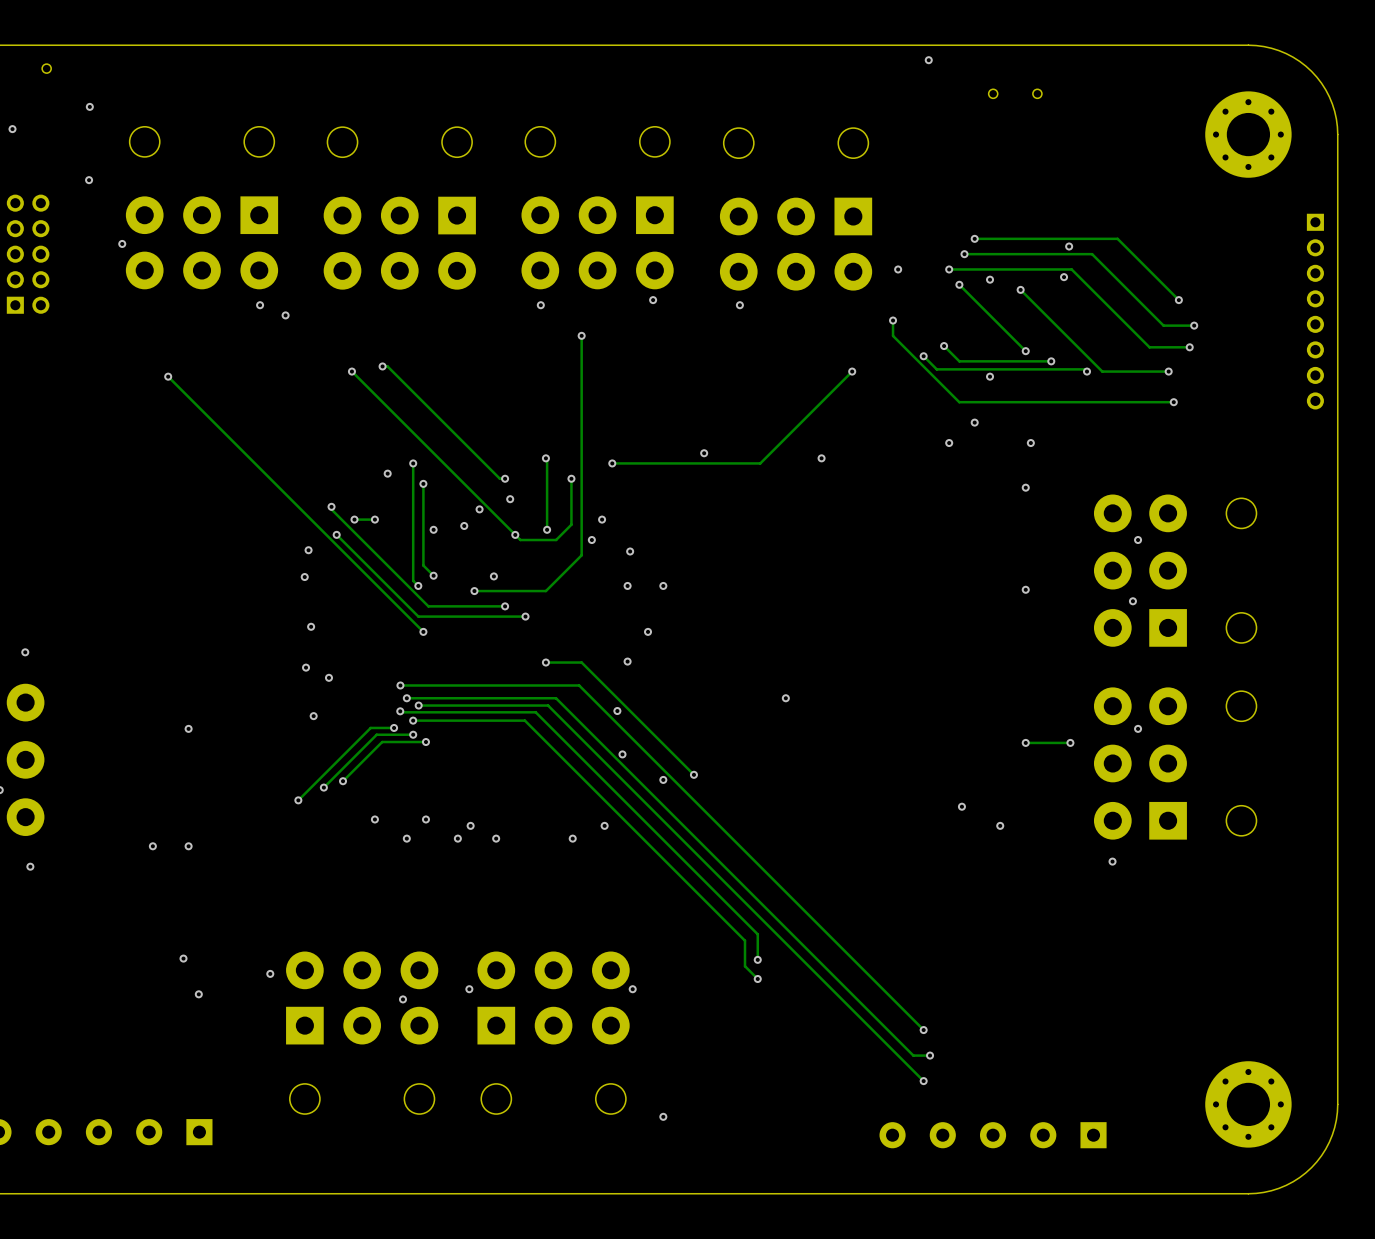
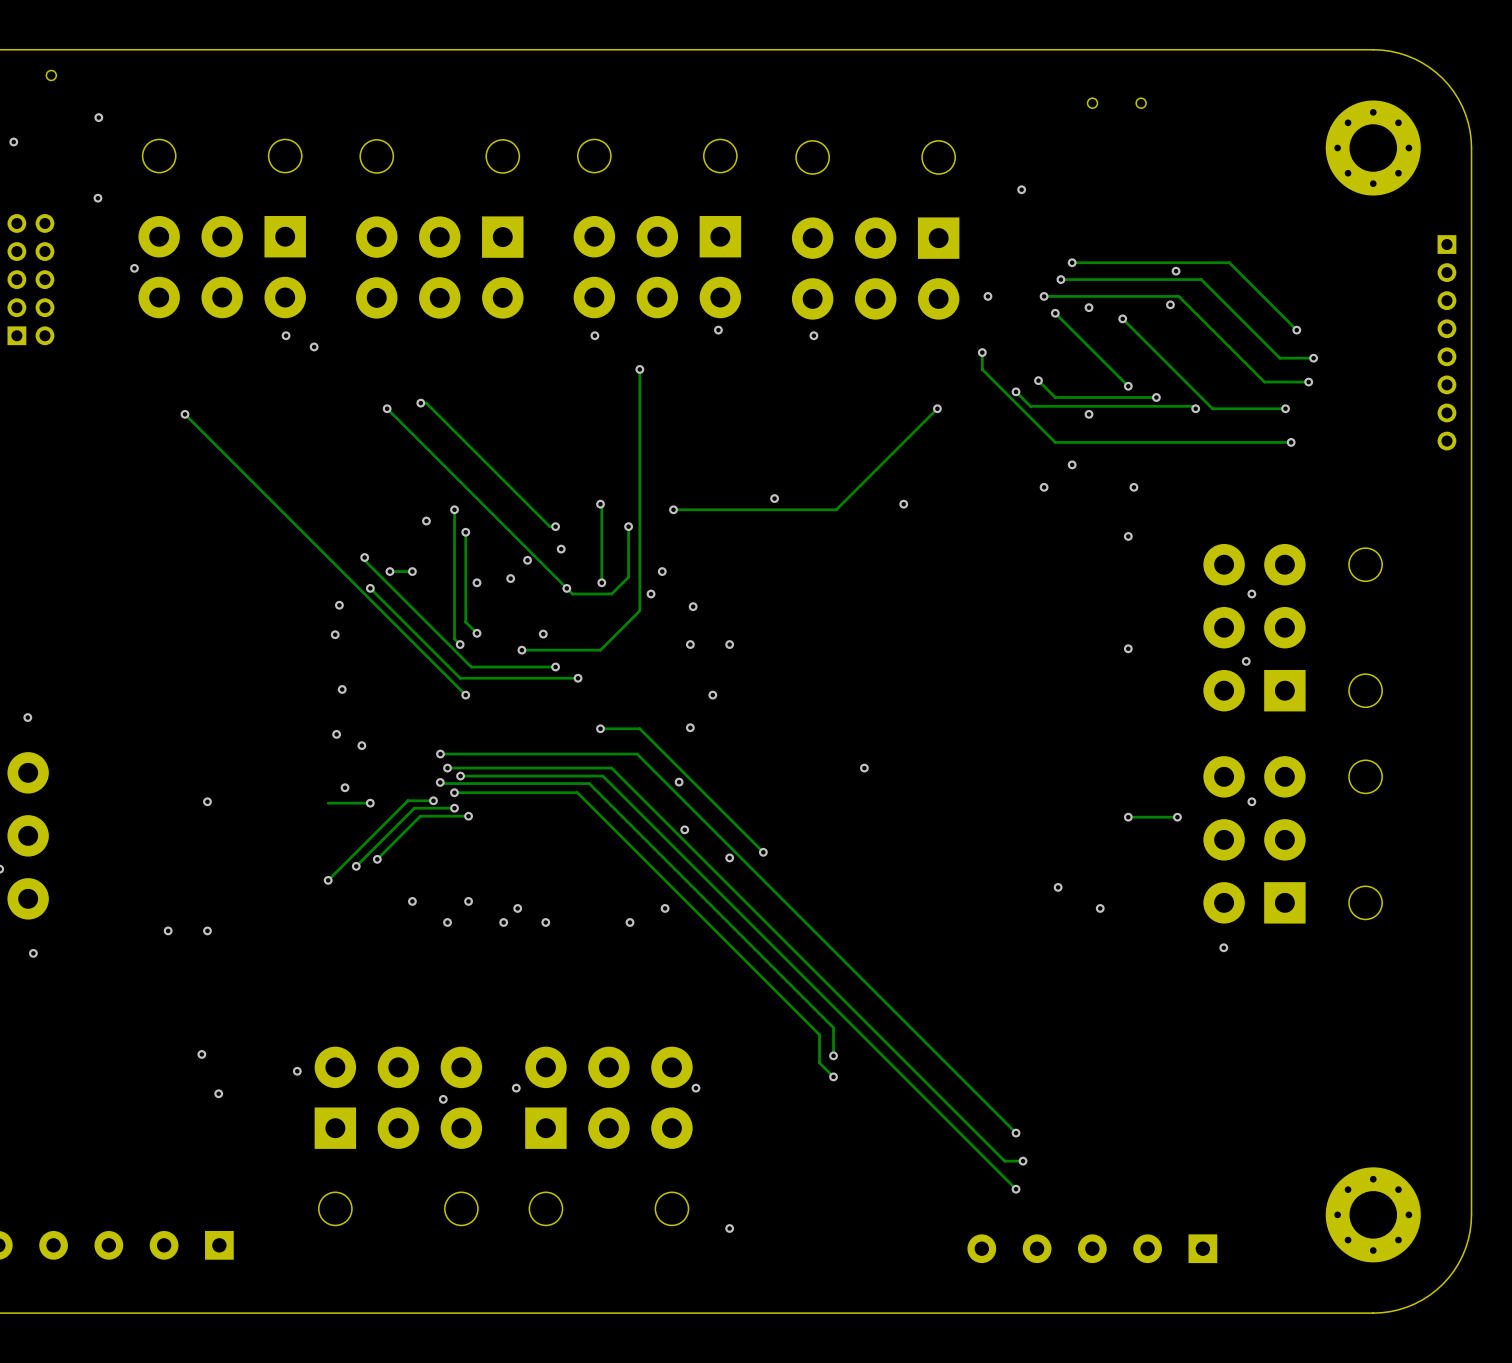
via: (928, 60) -> none
via: none -> (1021, 189)
track: none -> (370, 803) (328, 803)
via: none -> (370, 803)

